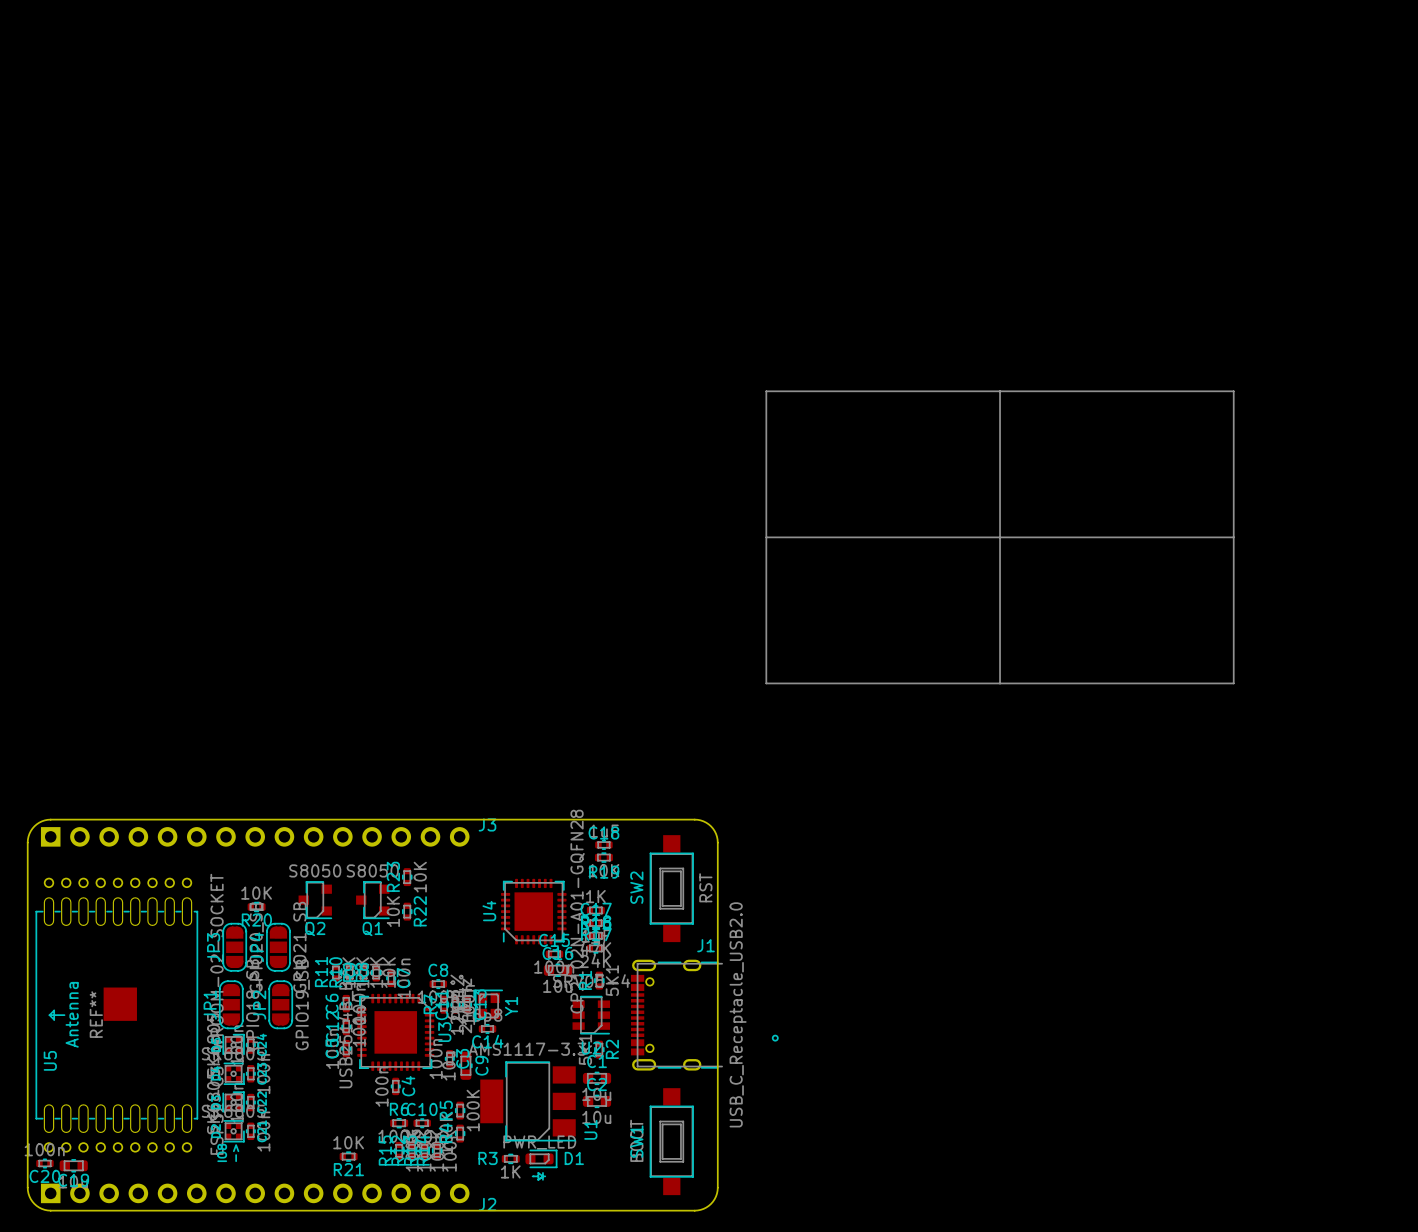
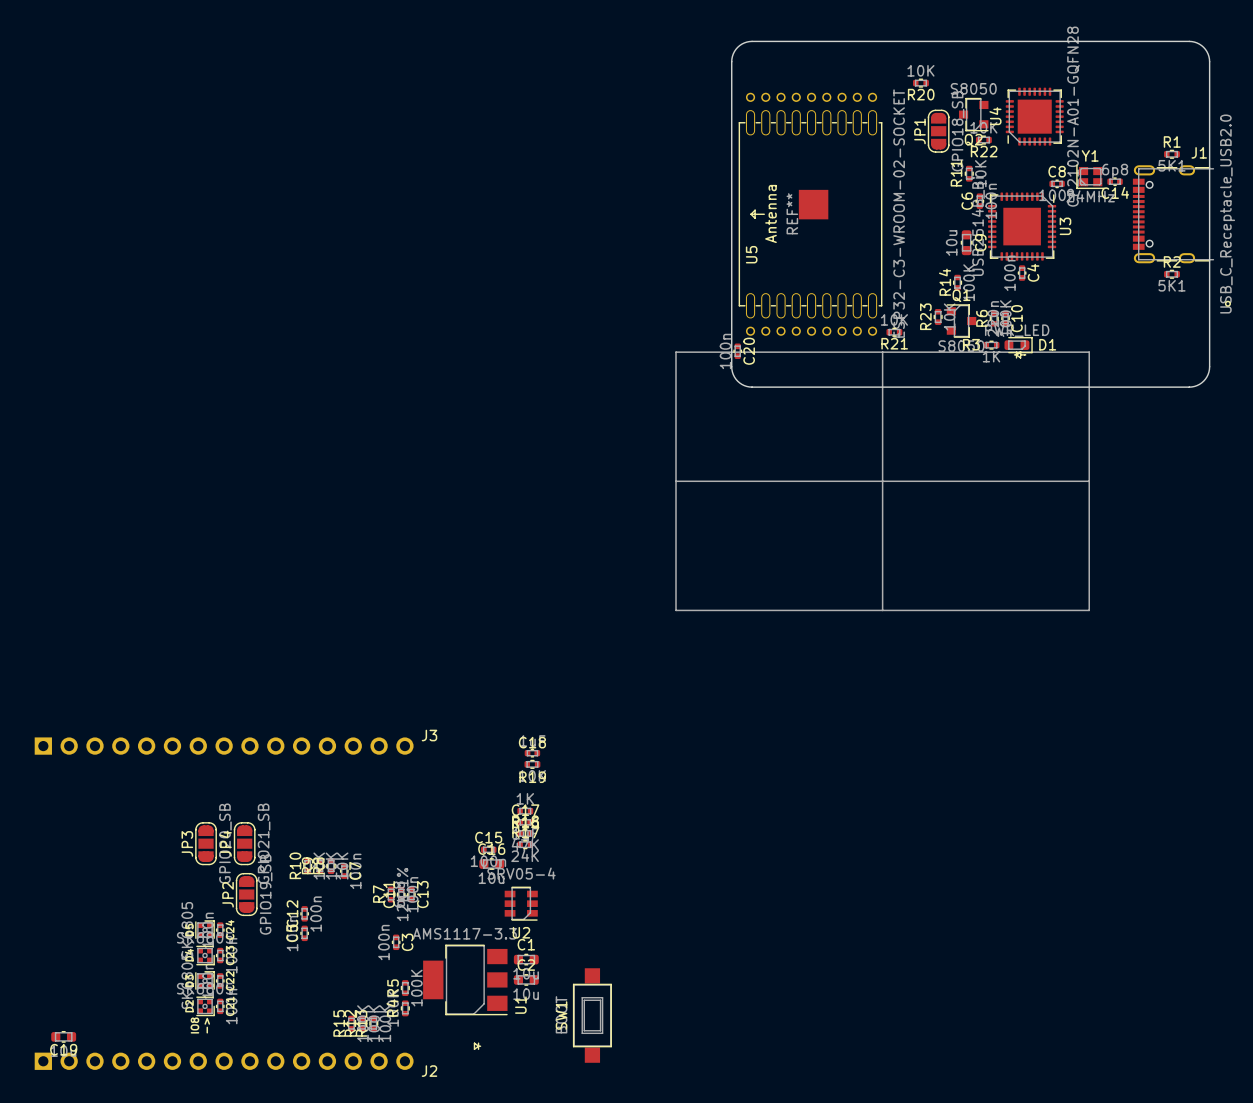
board edge: none -> (752, 41) (1189, 41) (1201, 45) (1208, 53) (1209, 61) (1209, 366) (1205, 379) (1199, 384) (1189, 387) (752, 387) (739, 382) (734, 376) (731, 366) (731, 61) (733, 53) (737, 47) (744, 42) (752, 41)
drawing: none -> [1224, 300, 1231, 307]
line: none -> (1016, 351) (1016, 357)
line: none -> (1014, 354) (1016, 354)
line: none -> (1016, 354) (1020, 351) (1020, 357) (1016, 354)
line: none -> (1020, 354) (1025, 354)
board edge: (50, 819) (694, 819) (706, 822) (714, 831) (717, 842) (717, 1187) (714, 1199) (706, 1207) (694, 1210) (50, 1210) (39, 1207) (30, 1199) (27, 1187) (27, 842) (29, 833) (34, 826) (41, 821) (50, 819) -> none
R23 position: (407, 877) -> (938, 316)
SW2: RST (671, 888) -> none
Q2 position: (315, 900) -> (973, 114)
Q1 rotation: 0° (372, 900) -> 180° (961, 321)
Q1 position: (372, 900) -> (961, 321)
R20 position: (256, 907) -> (920, 83)
R22 rotation: 0° (407, 911) -> 90° clockwise (983, 140)
R22 position: (407, 911) -> (983, 140)
U4 position: (533, 911) -> (1034, 116)
R11 position: (335, 972) -> (969, 173)
R1 rotation: 0° (599, 980) -> 90° clockwise (1172, 154)
R1 position: (599, 980) -> (1172, 154)
C8 position: (438, 984) -> (1057, 183)
C6 position: (346, 1003) -> (979, 201)
JP1 position: (231, 1004) -> (938, 131)
Y1 rotation: 0° (488, 1005) -> 90° counterclockwise (1090, 176)
Y1 position: (488, 1005) -> (1090, 176)
U5 position: (116, 1015) -> (810, 214)
J1 position: (676, 1015) -> (1173, 214)
C14 position: (487, 1028) -> (1115, 181)
U3 position: (395, 1032) -> (1022, 226)
drawing: [771, 1034, 779, 1042] -> none
R2 rotation: 0° (599, 1049) -> 90° clockwise (1172, 274)
R2 position: (599, 1049) -> (1172, 274)
C9 position: (465, 1065) -> (966, 242)
C4 position: (395, 1086) -> (1022, 273)
R6 rotation: 0° (399, 1123) -> 90° clockwise (994, 318)
R6 position: (399, 1123) -> (994, 318)
C10 rotation: 0° (422, 1123) -> 90° clockwise (1005, 318)
C10 position: (422, 1123) -> (1005, 318)
R14 position: (437, 1150) -> (957, 282)
R21 position: (348, 1156) -> (894, 332)
R3 position: (510, 1158) -> (991, 345)
D1 position: (541, 1158) -> (1018, 345)
C20 rotation: 0° (44, 1163) -> 90° clockwise (737, 351)
C20 position: (44, 1163) -> (737, 351)
line: (532, 1176) (538, 1176) -> none

